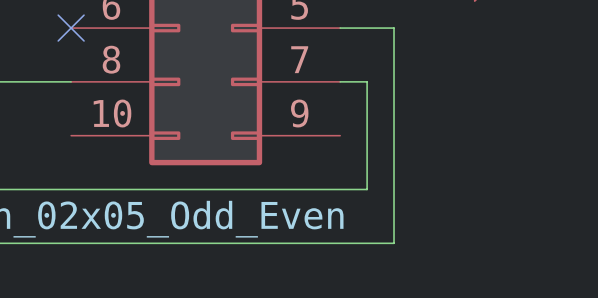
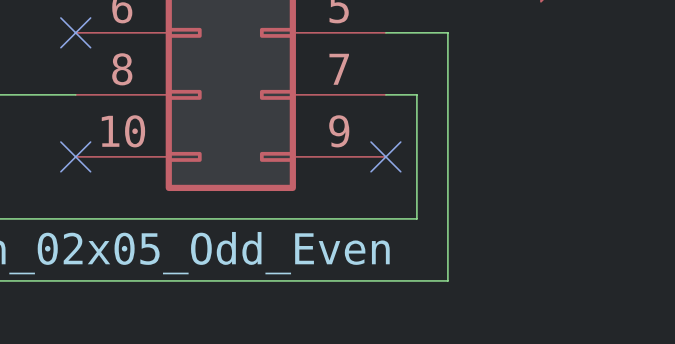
no-connect mark: none -> (75, 156)
no-connect mark: none -> (385, 156)

